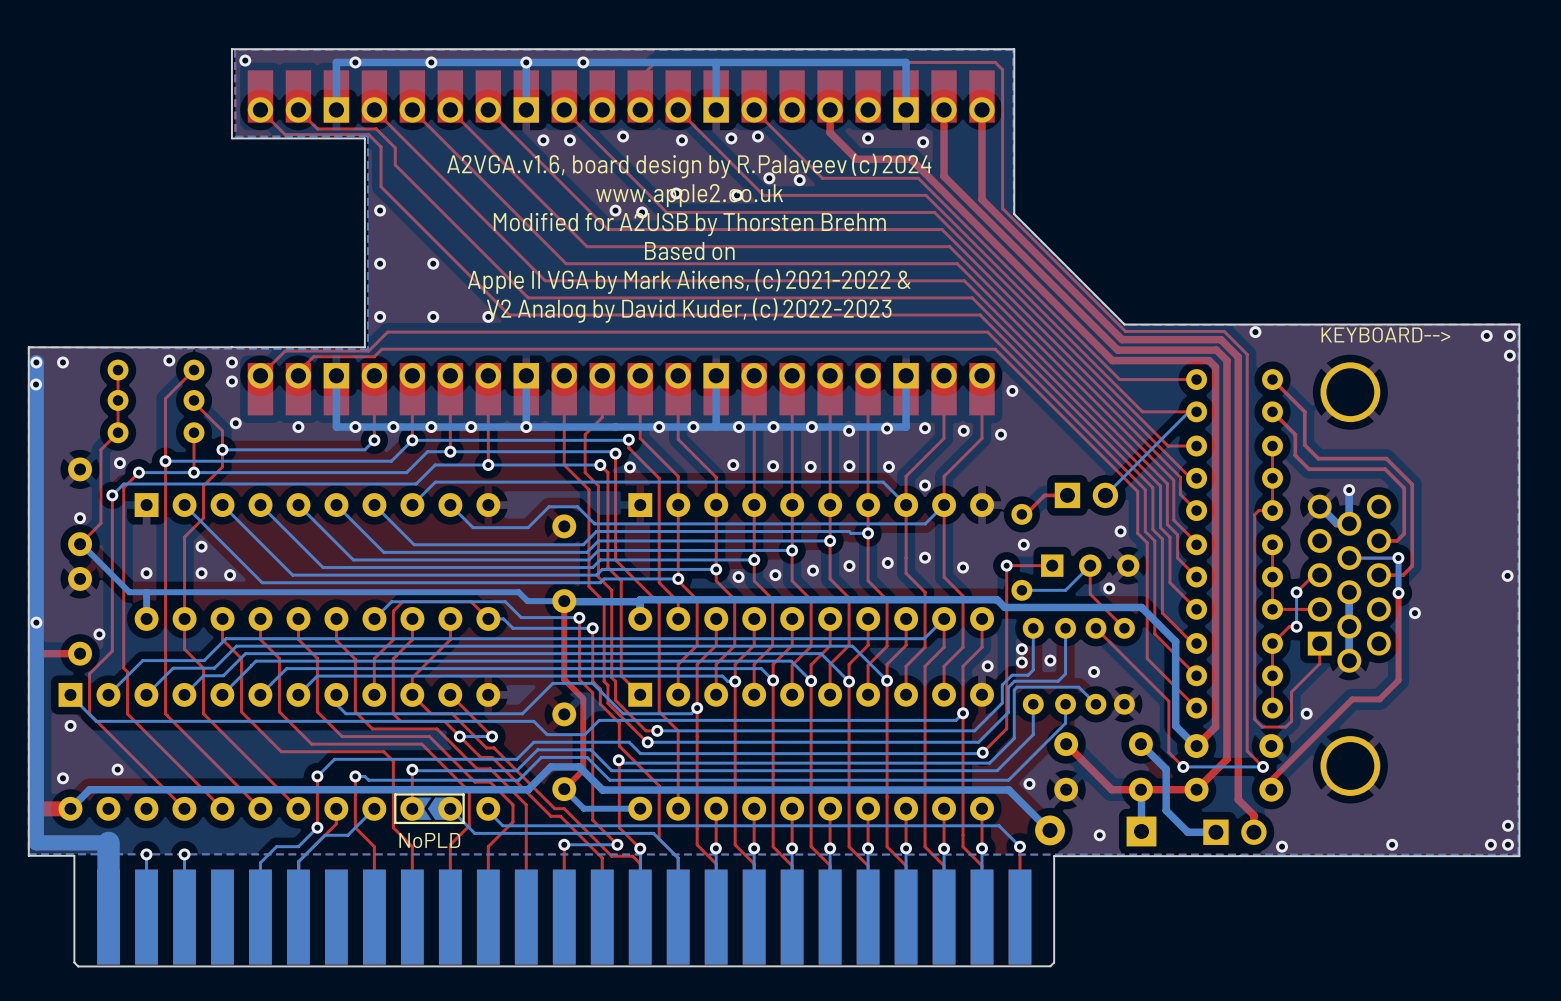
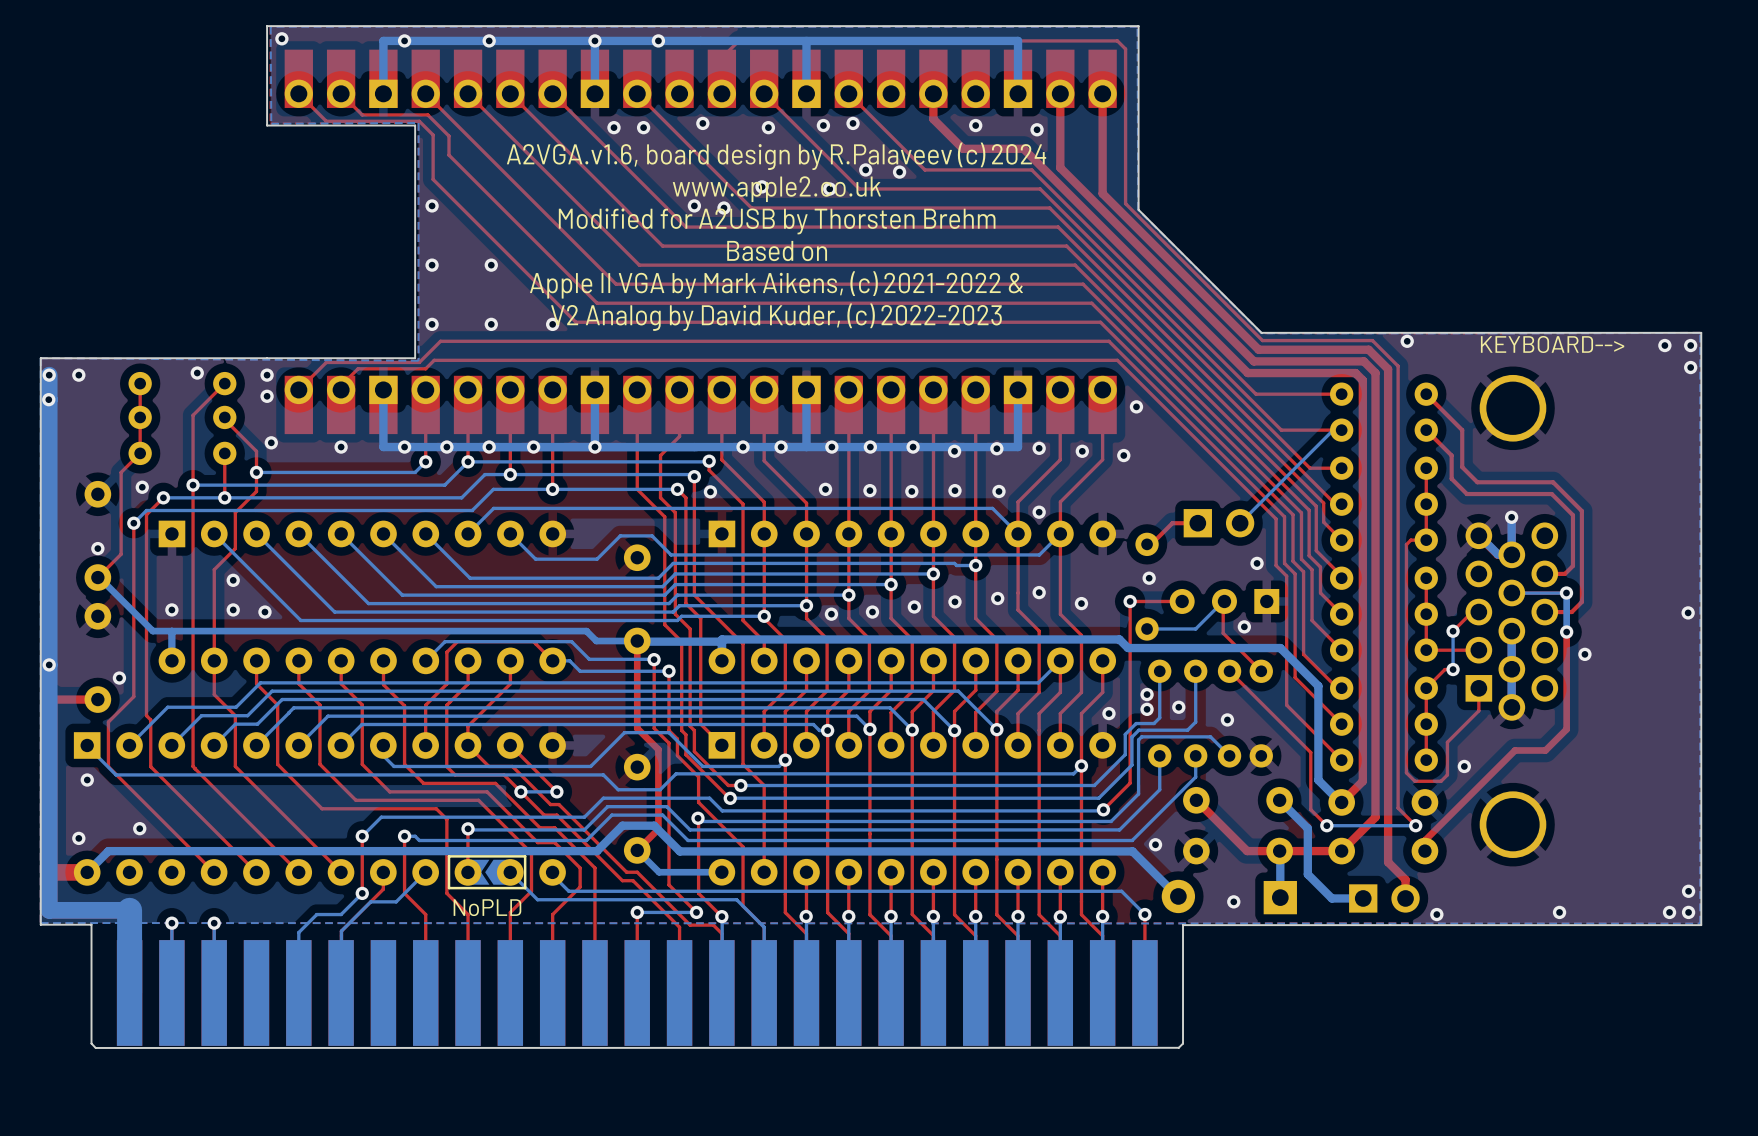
part rotation: 0° (1090, 565) -> 180° (1224, 601)

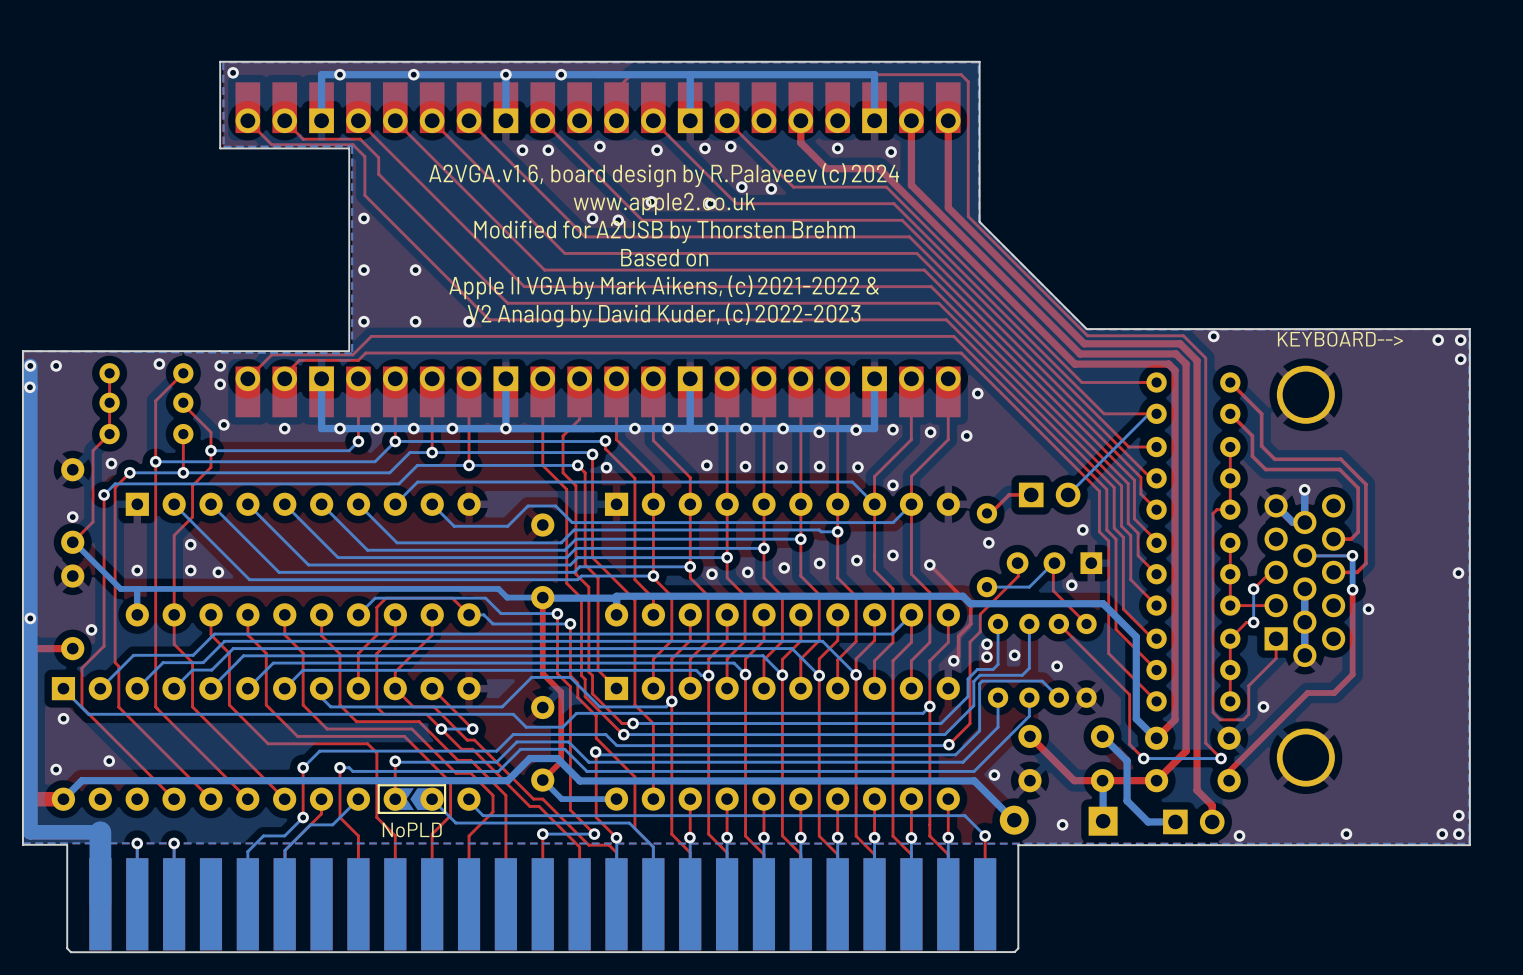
via: (1130, 601) -> none
top track: (1183, 601) (1130, 601) (1130, 783) (1127, 785) -> (1018, 563) (1018, 576) (980, 614) (980, 631) (970, 642) (970, 723)
top track: none -> (929, 564) (970, 605) (970, 623) (958, 636) (958, 656) (953, 660)

